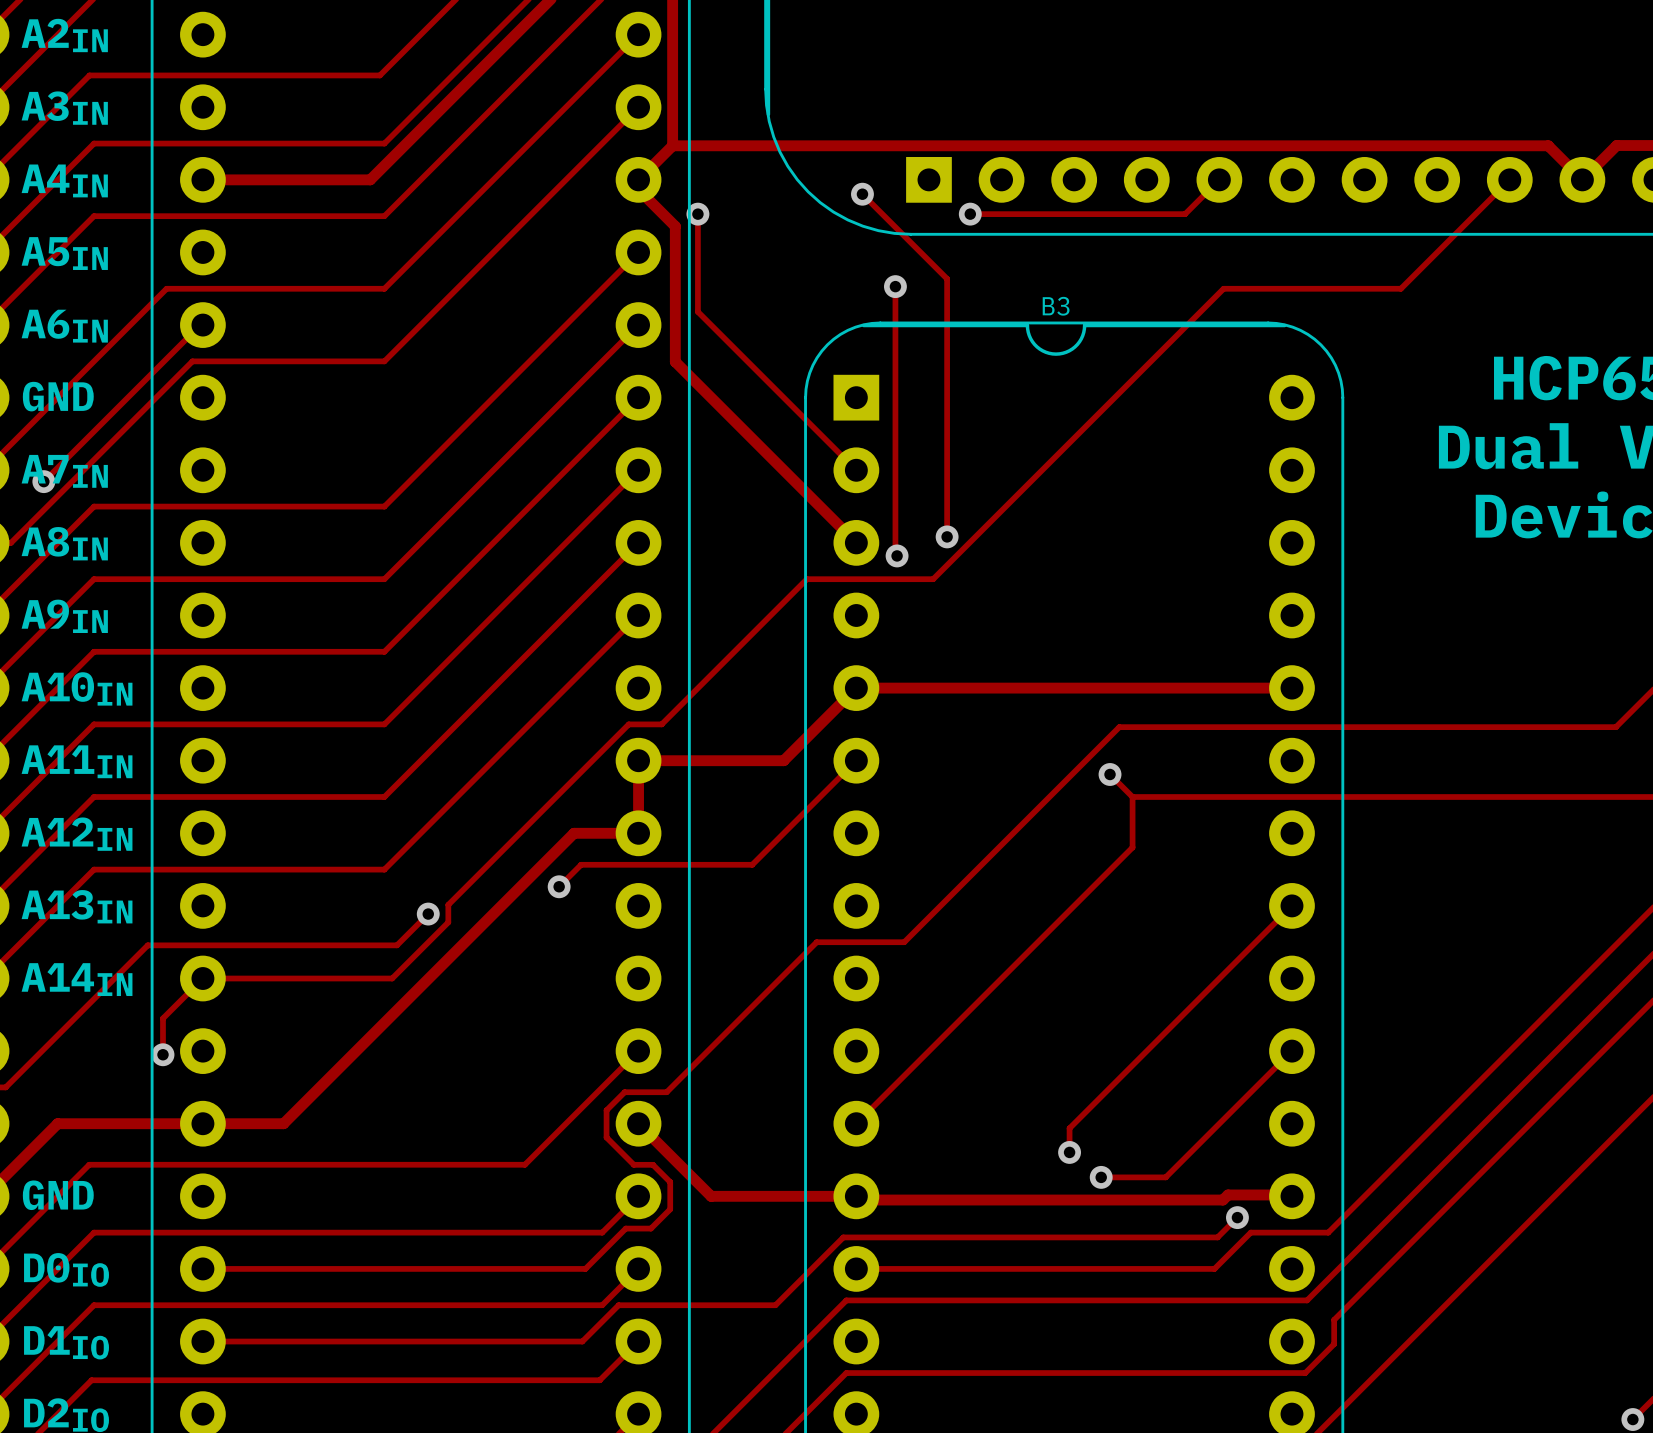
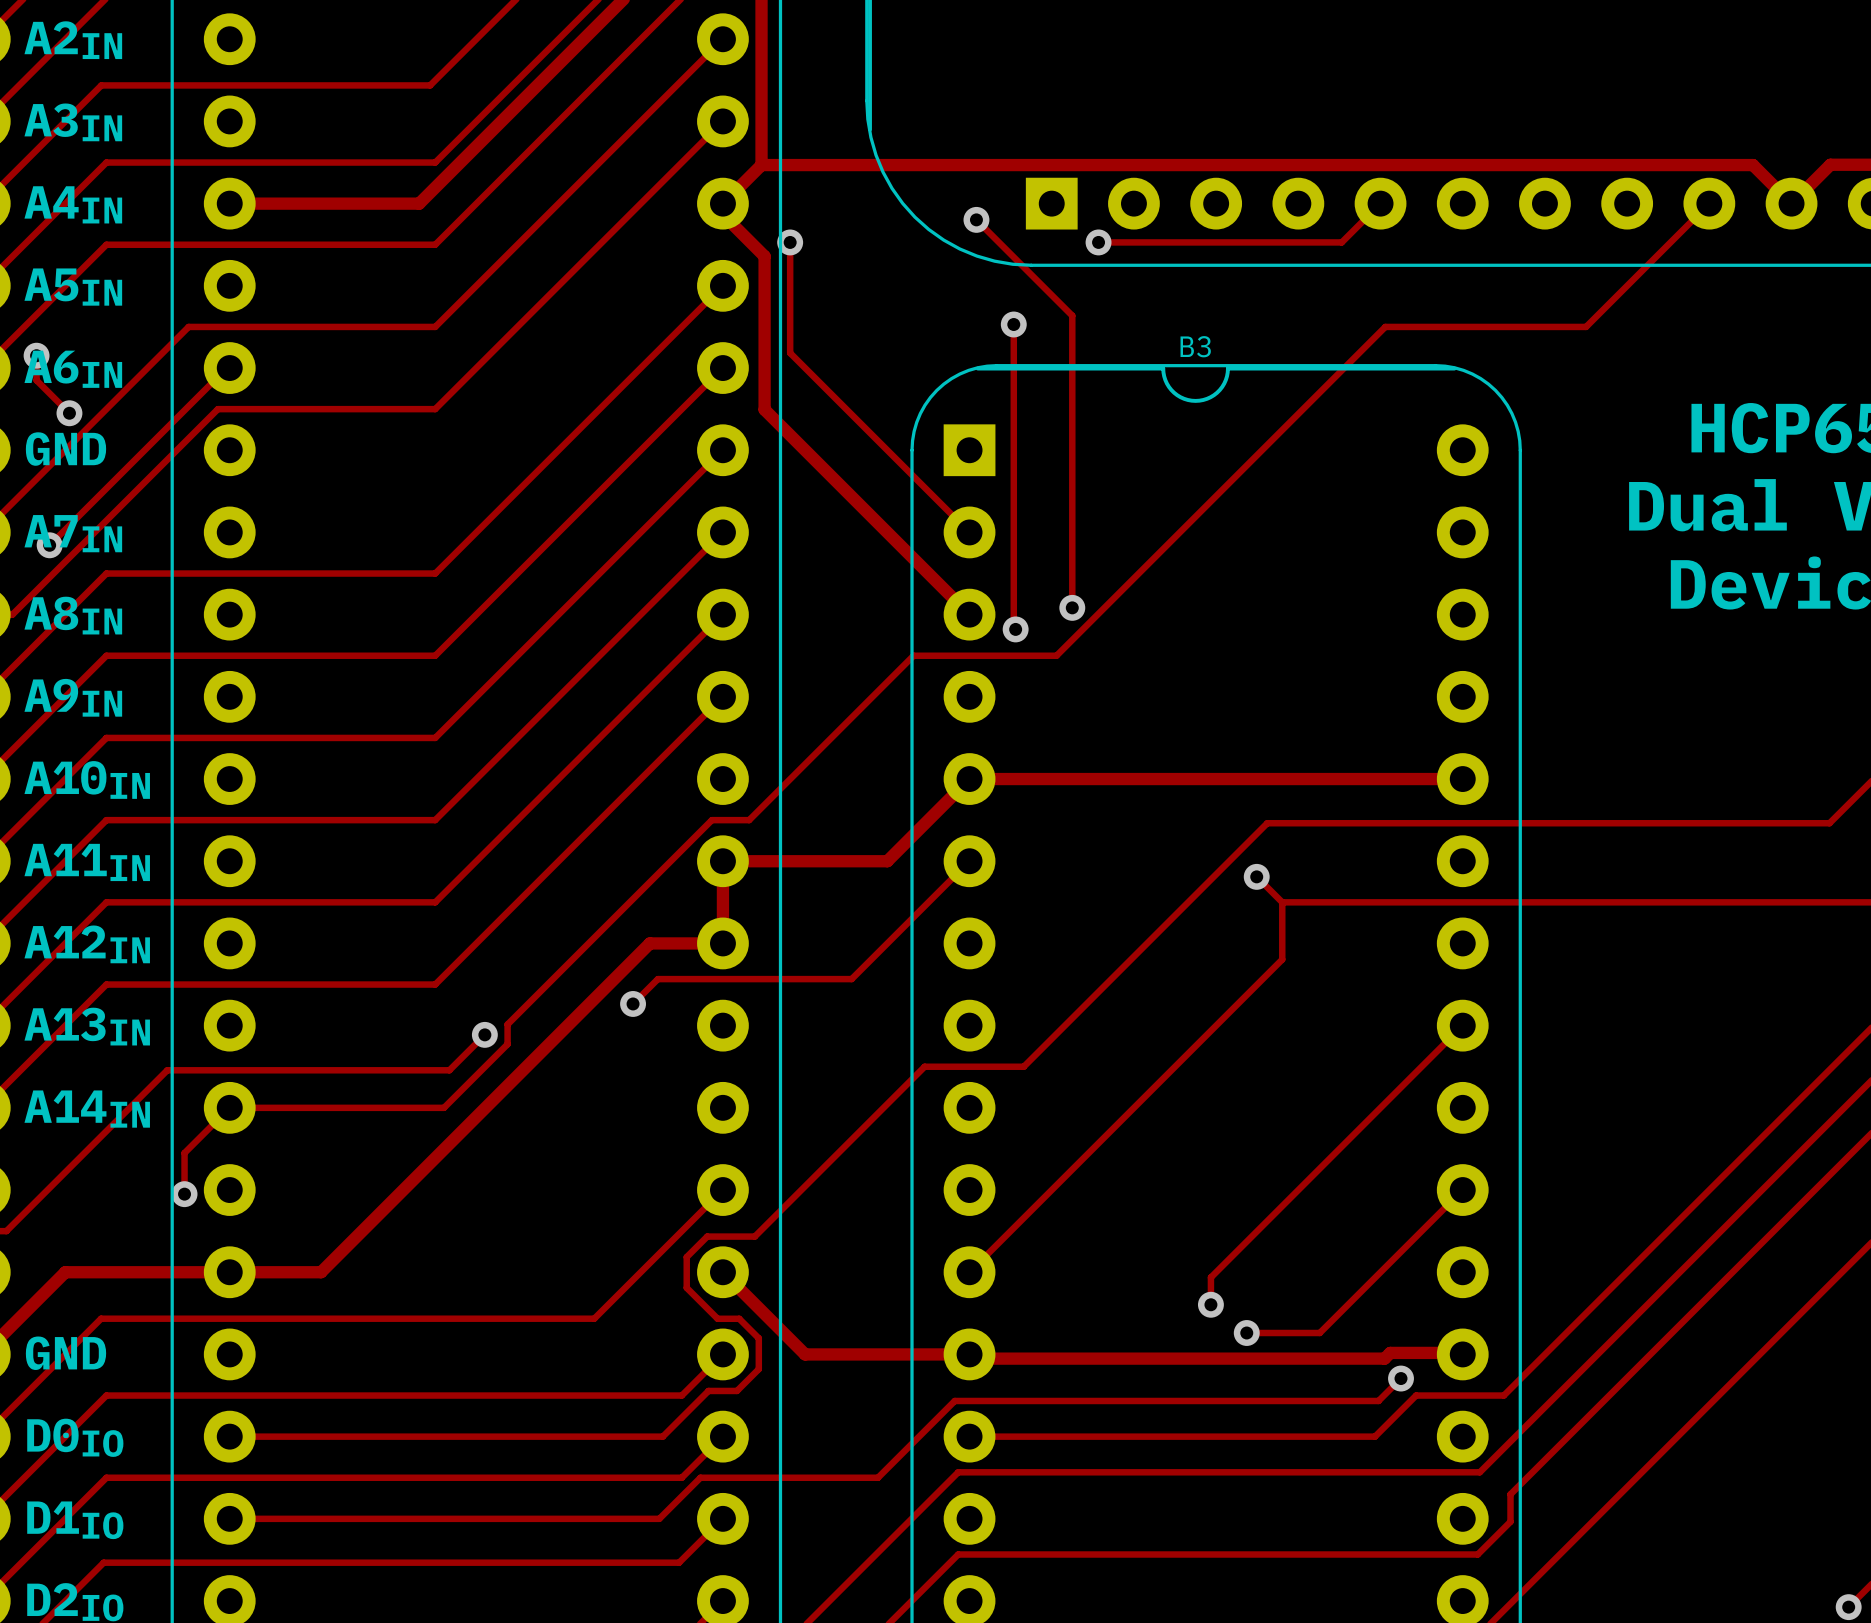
track: none -> (36, 355) (36, 380) (69, 413)
via: none -> (36, 355)
via: none -> (69, 413)

